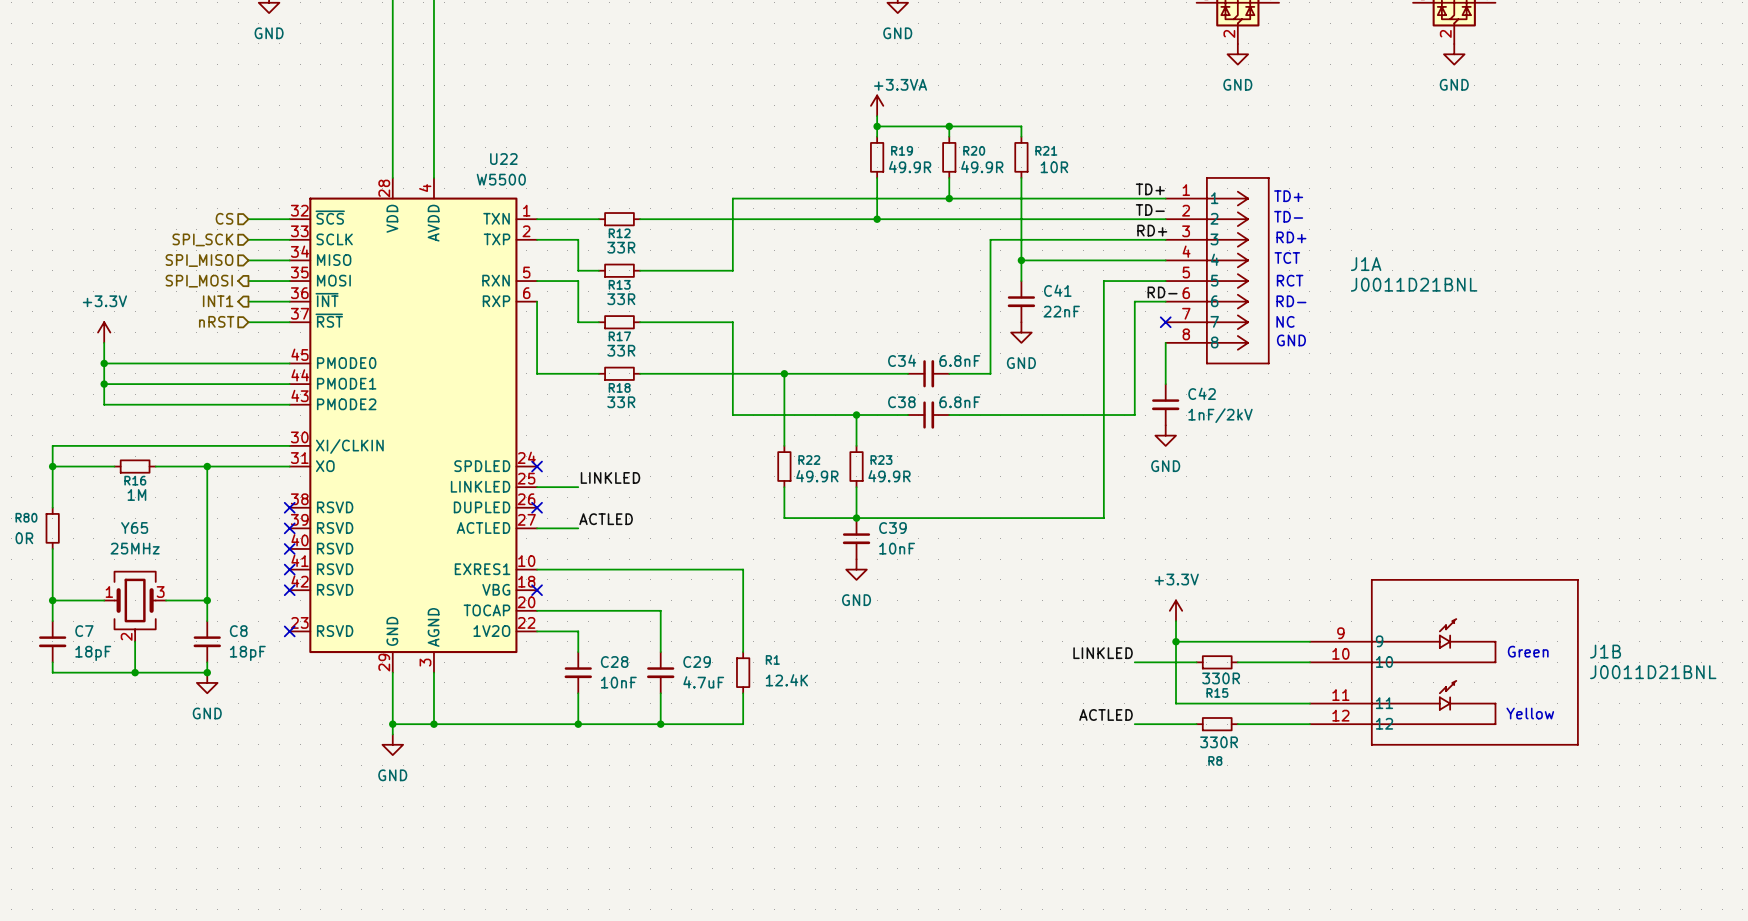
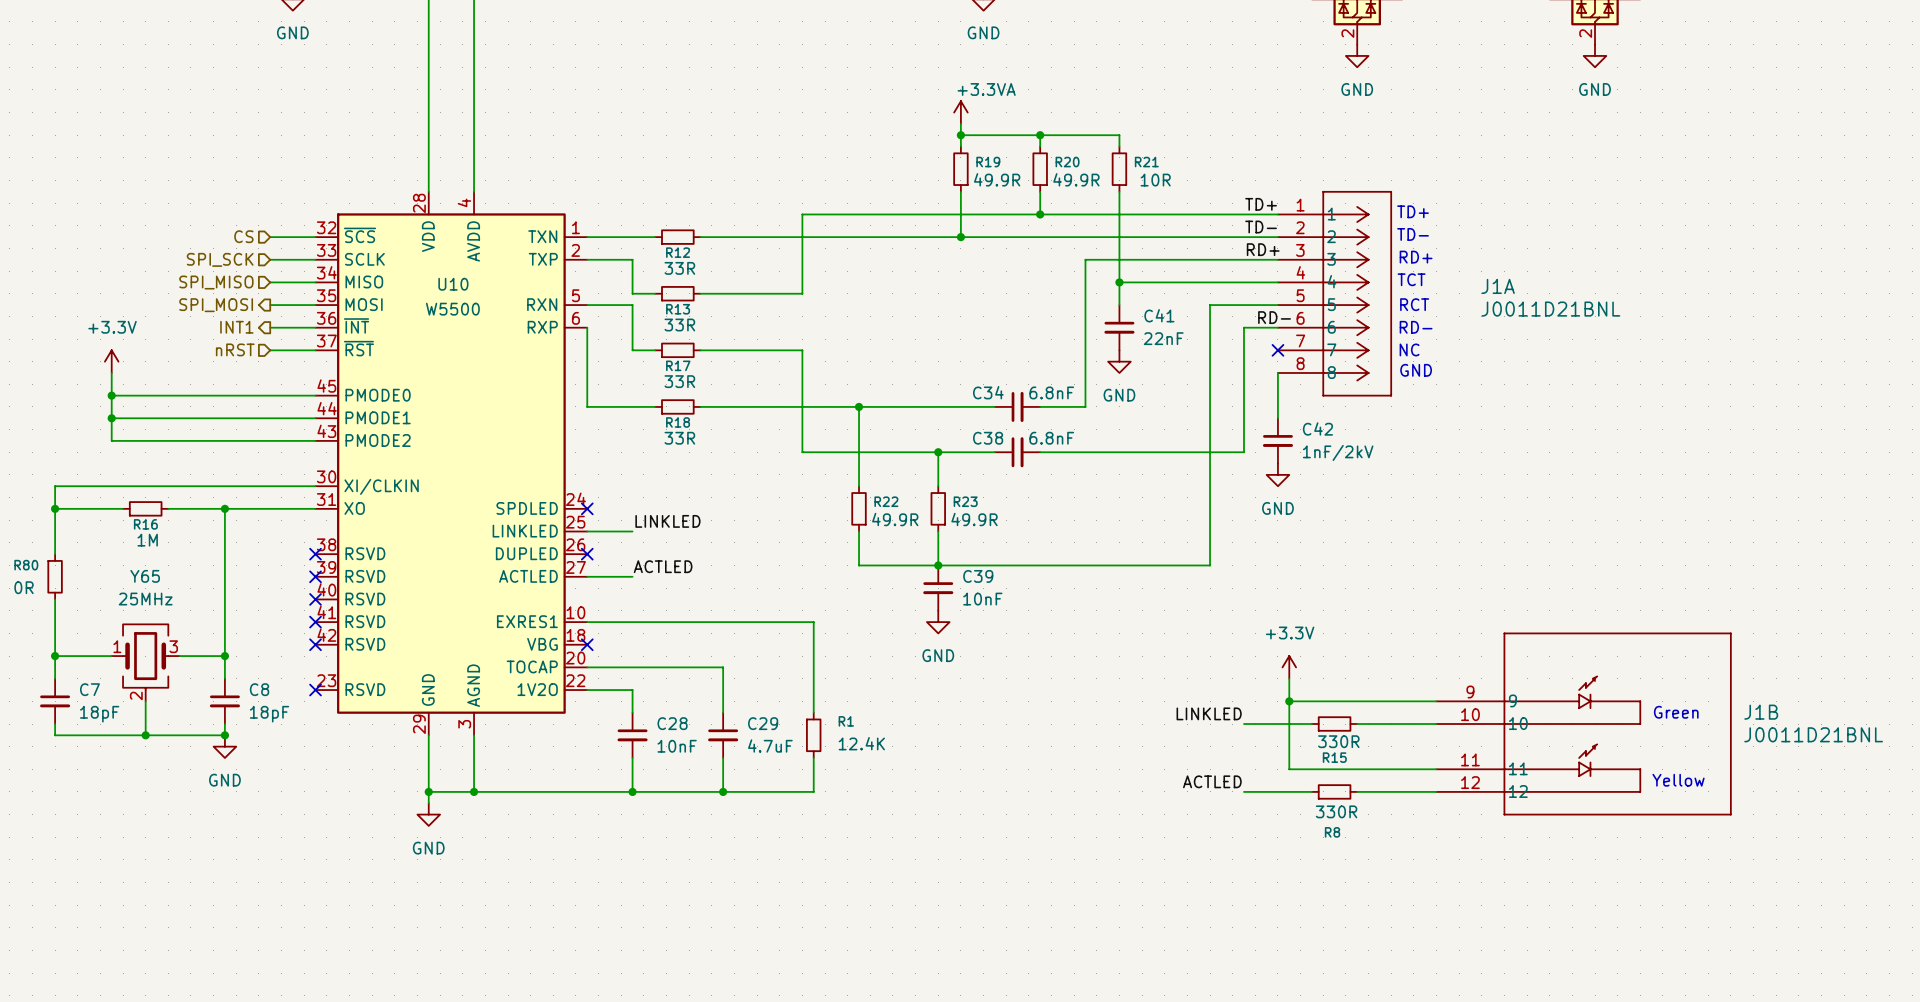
U22 name: U22 (503, 159) -> U10 (453, 284)
U22 value position: W5500 (501, 179) -> W5500 (452, 309)

